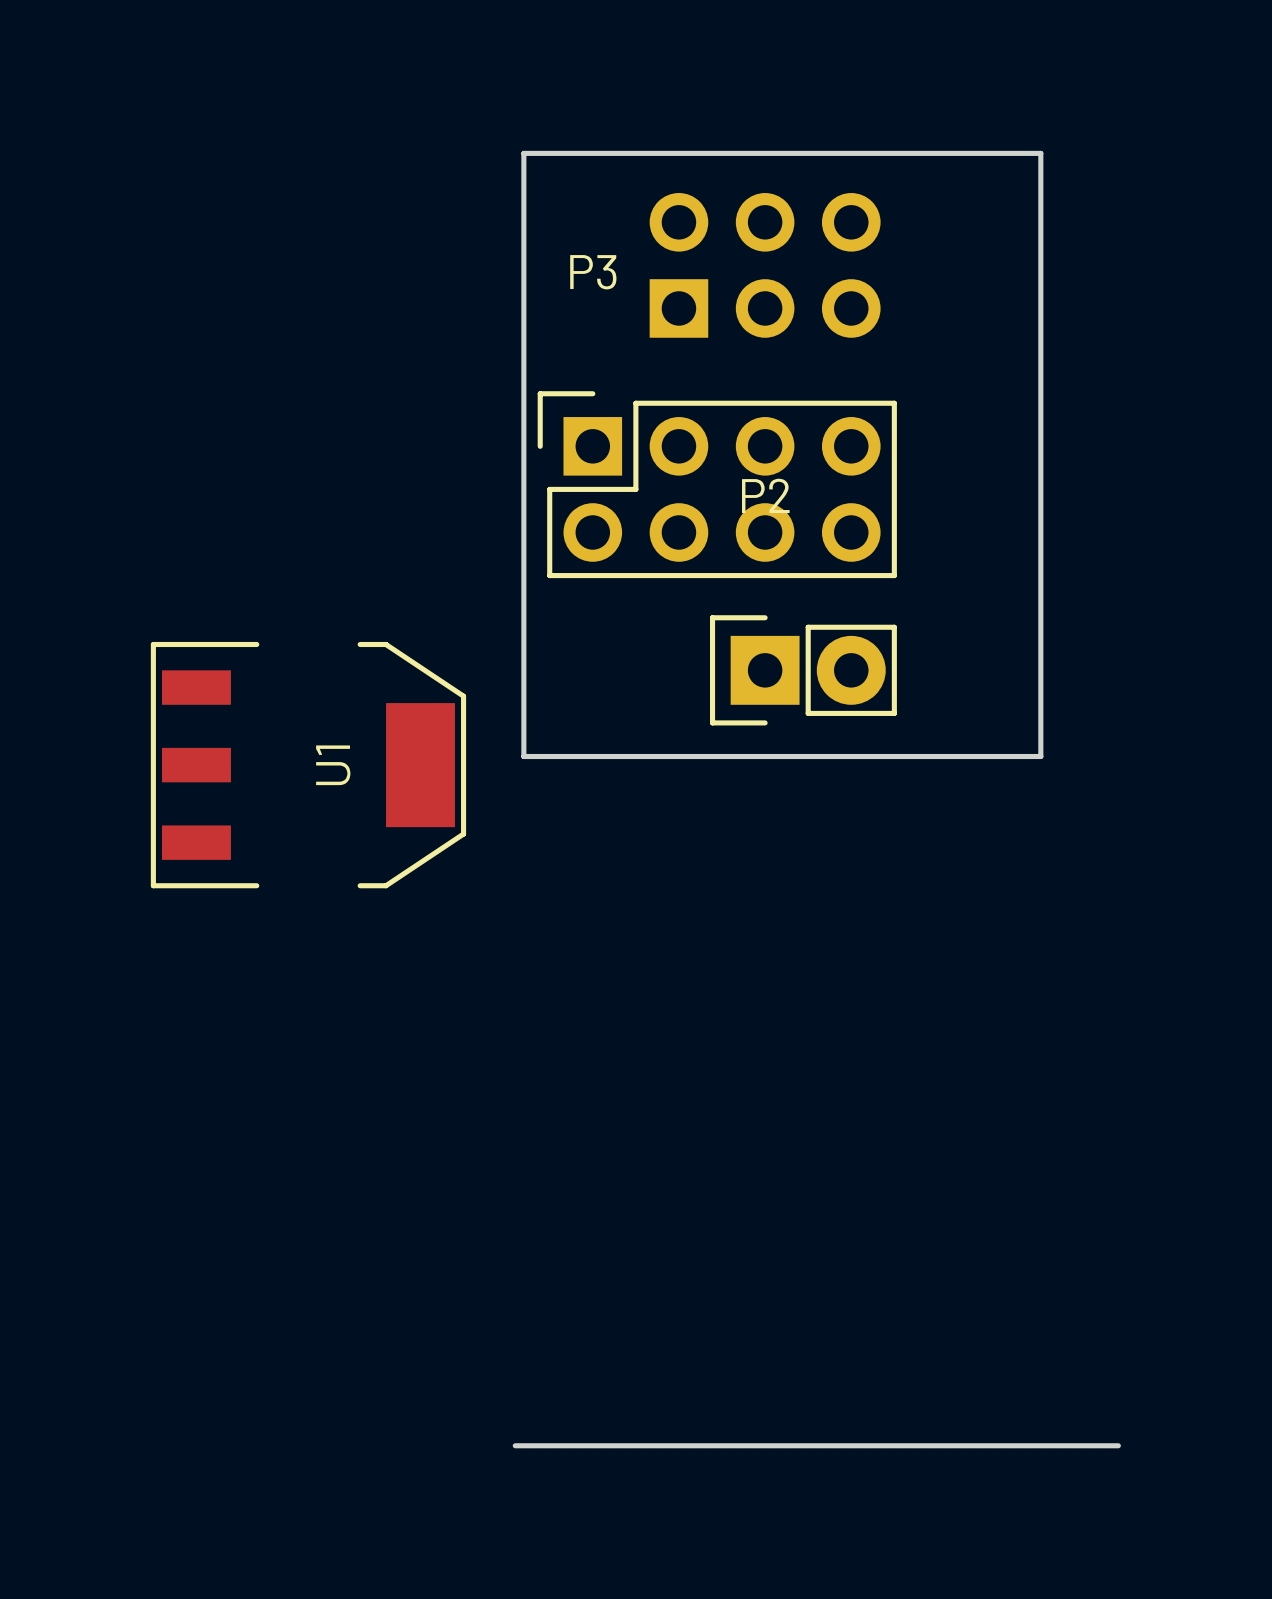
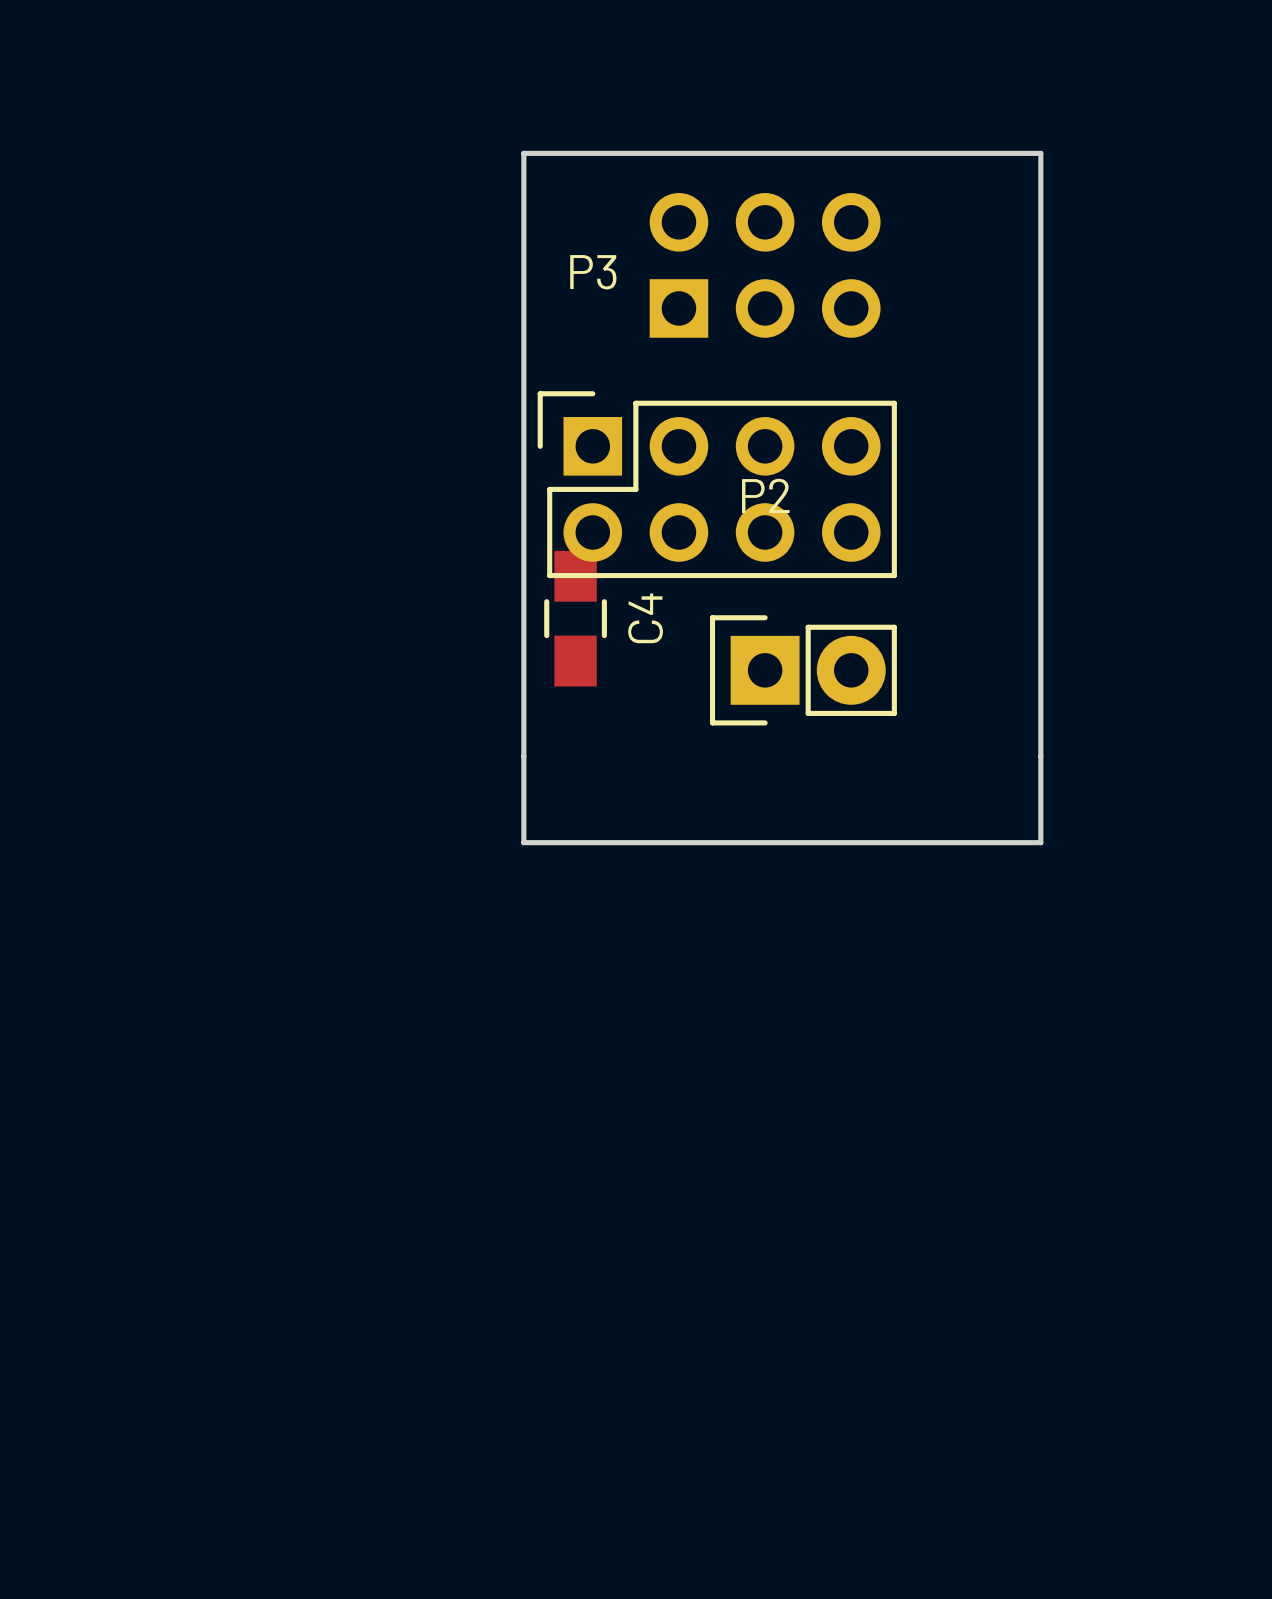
C4: none -> (575, 618)
board edge: (523, 756) (1040, 756) -> (523, 756) (523, 842) (1040, 842) (1040, 756)
U1: (308, 765) -> none
board edge: (515, 1445) (1118, 1445) -> none

